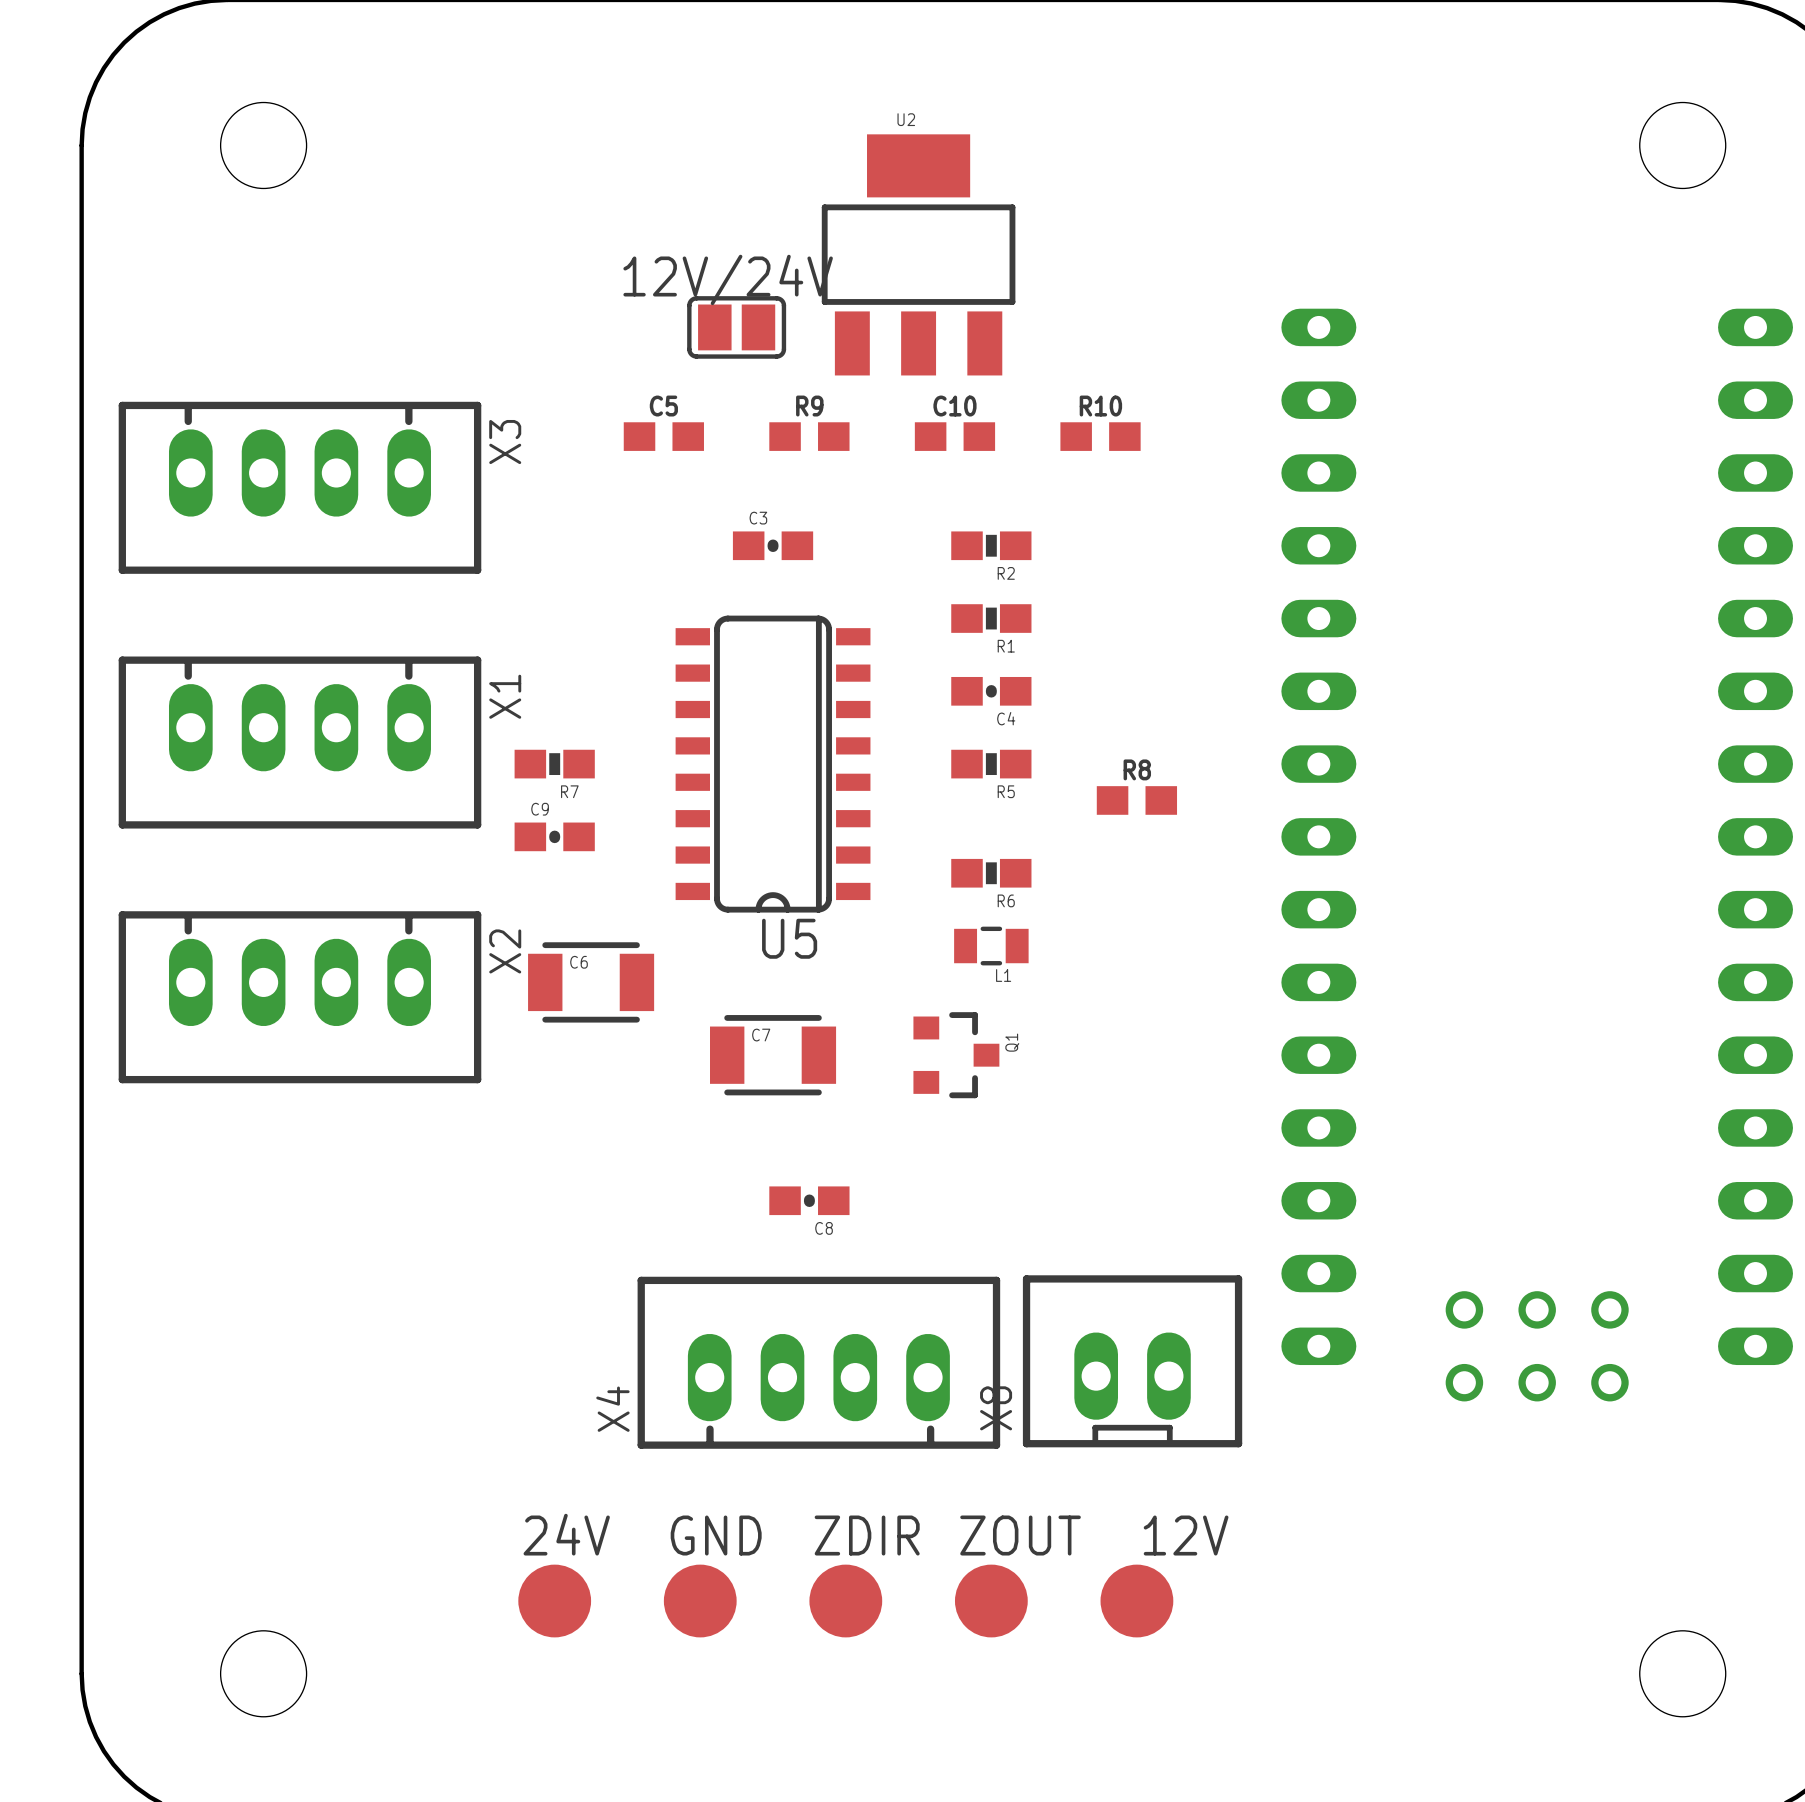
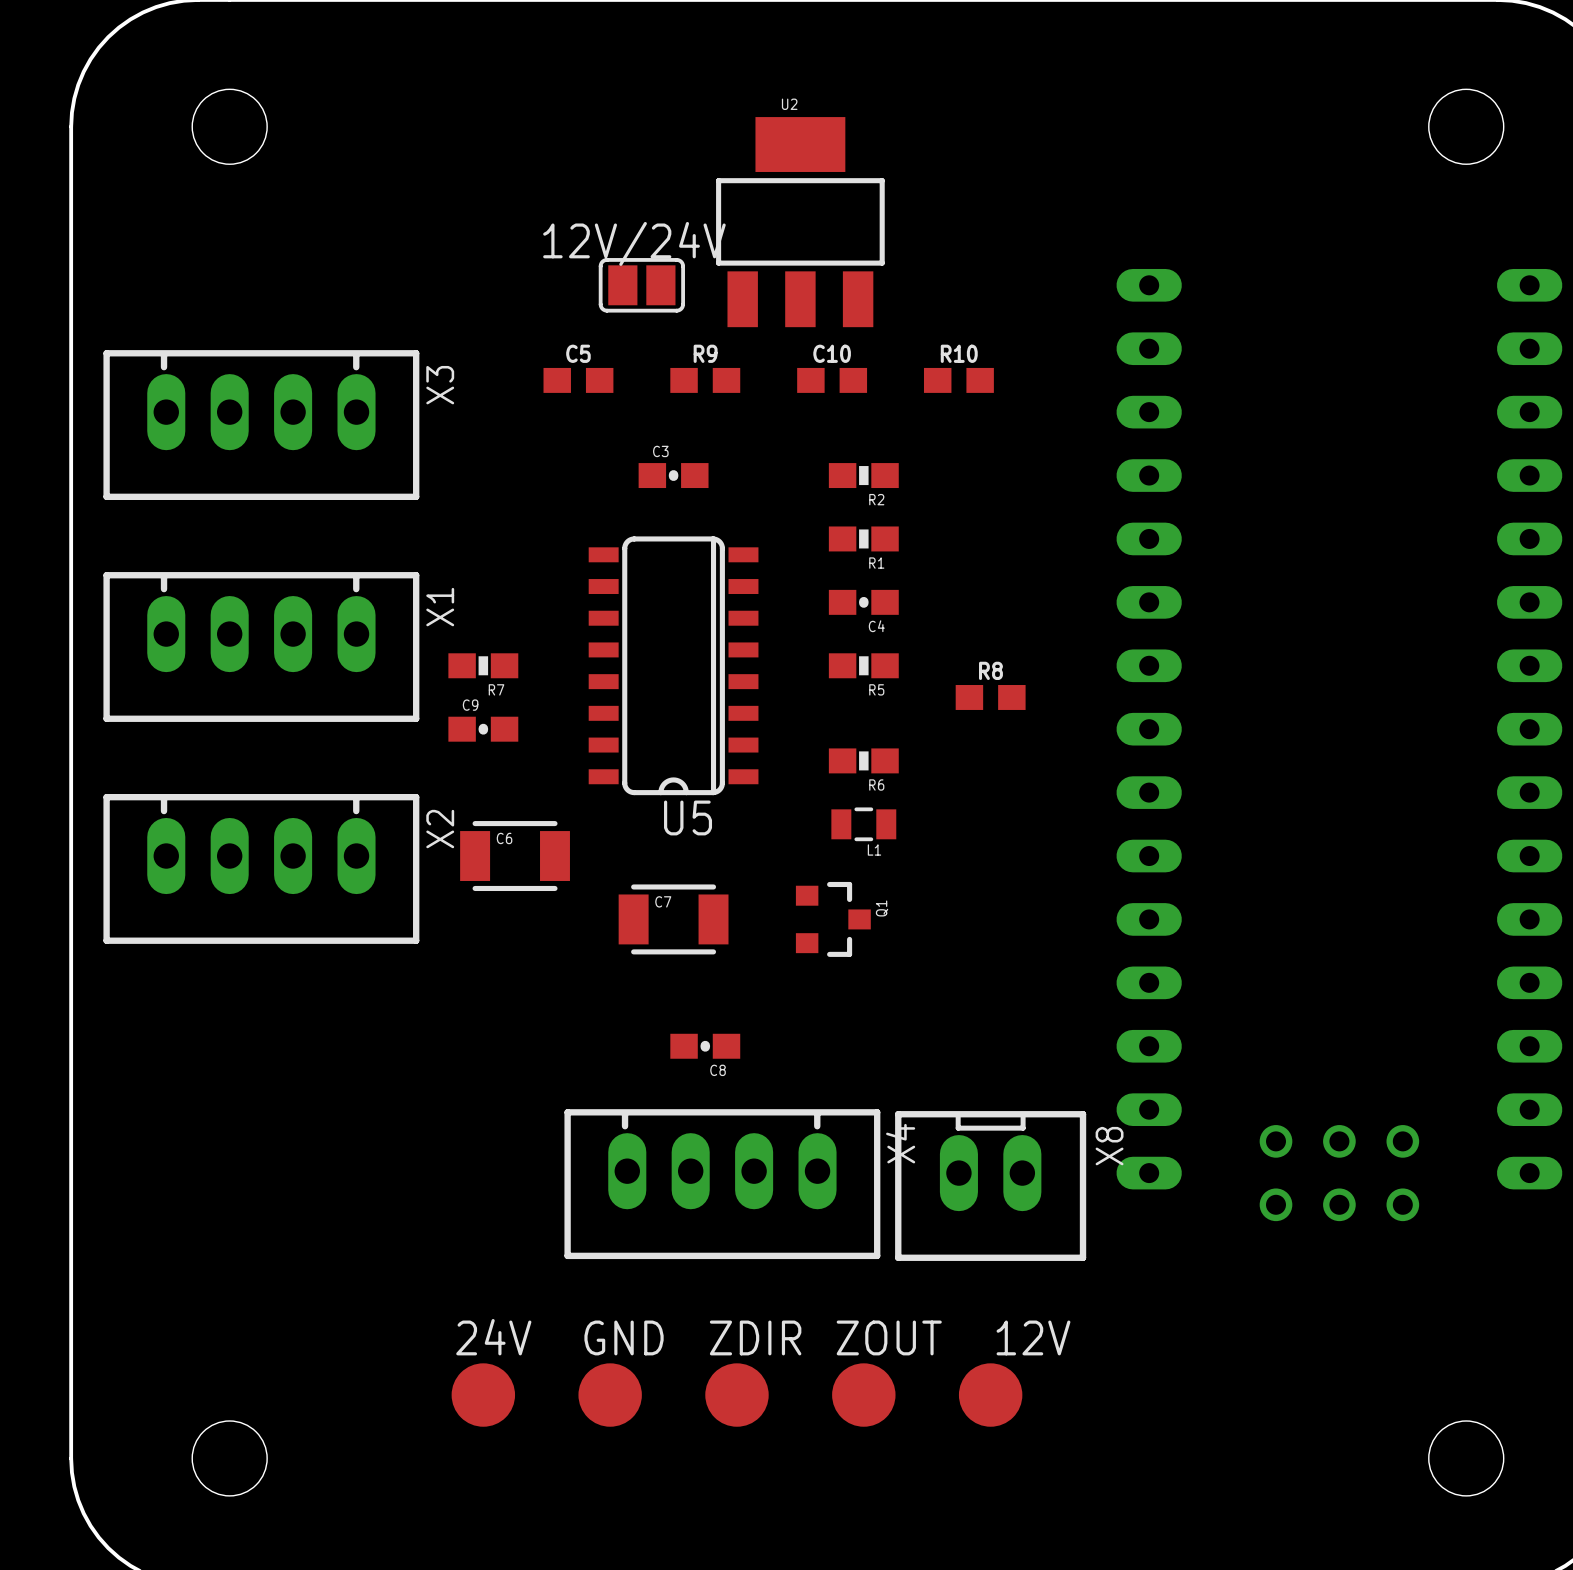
X8 rotation: 0° (1132, 1361) -> 180° (990, 1186)
X4 rotation: 0° (818, 1362) -> 180° (722, 1184)

